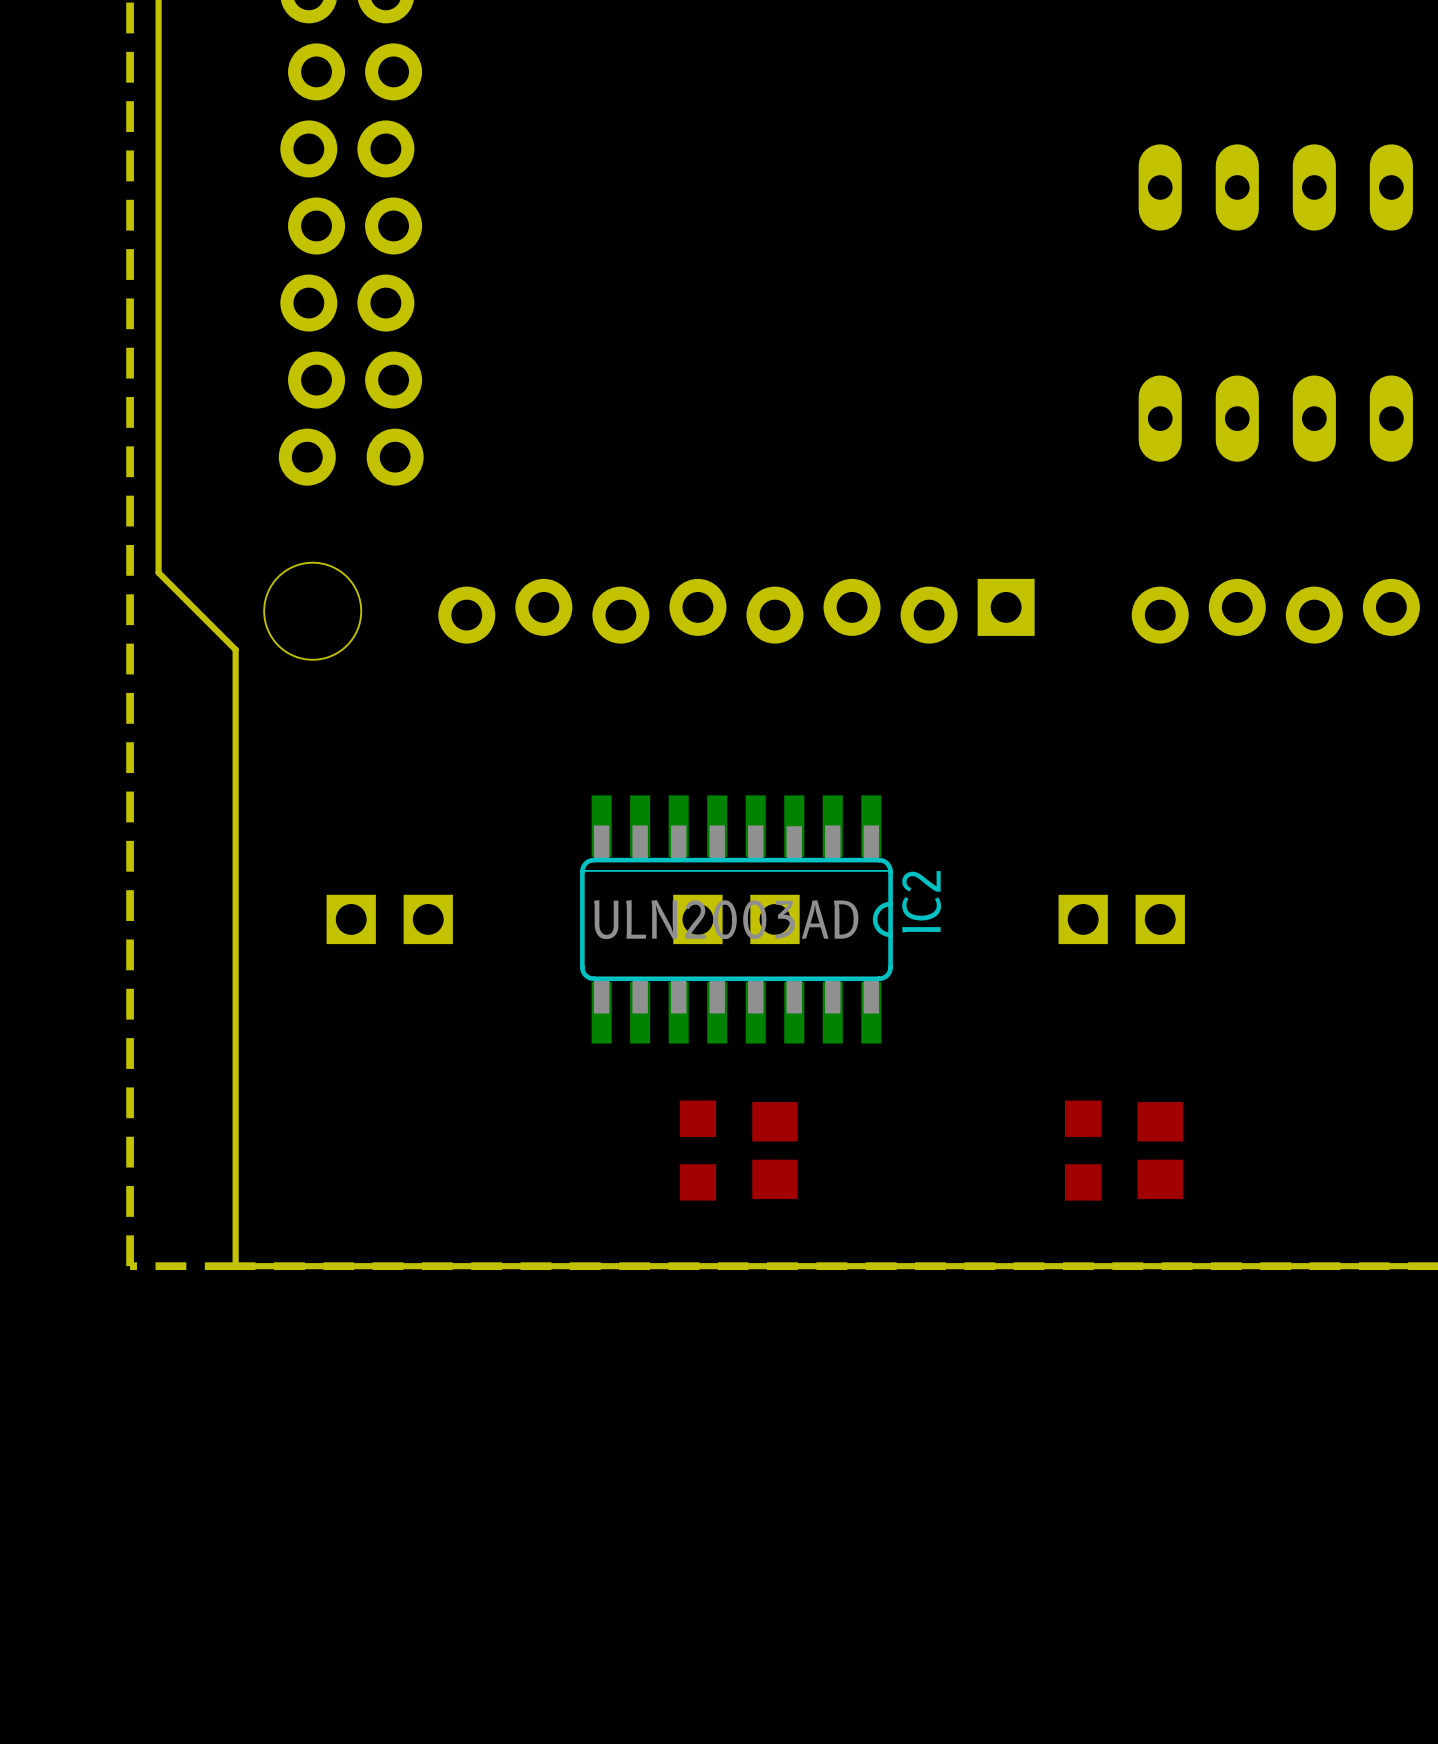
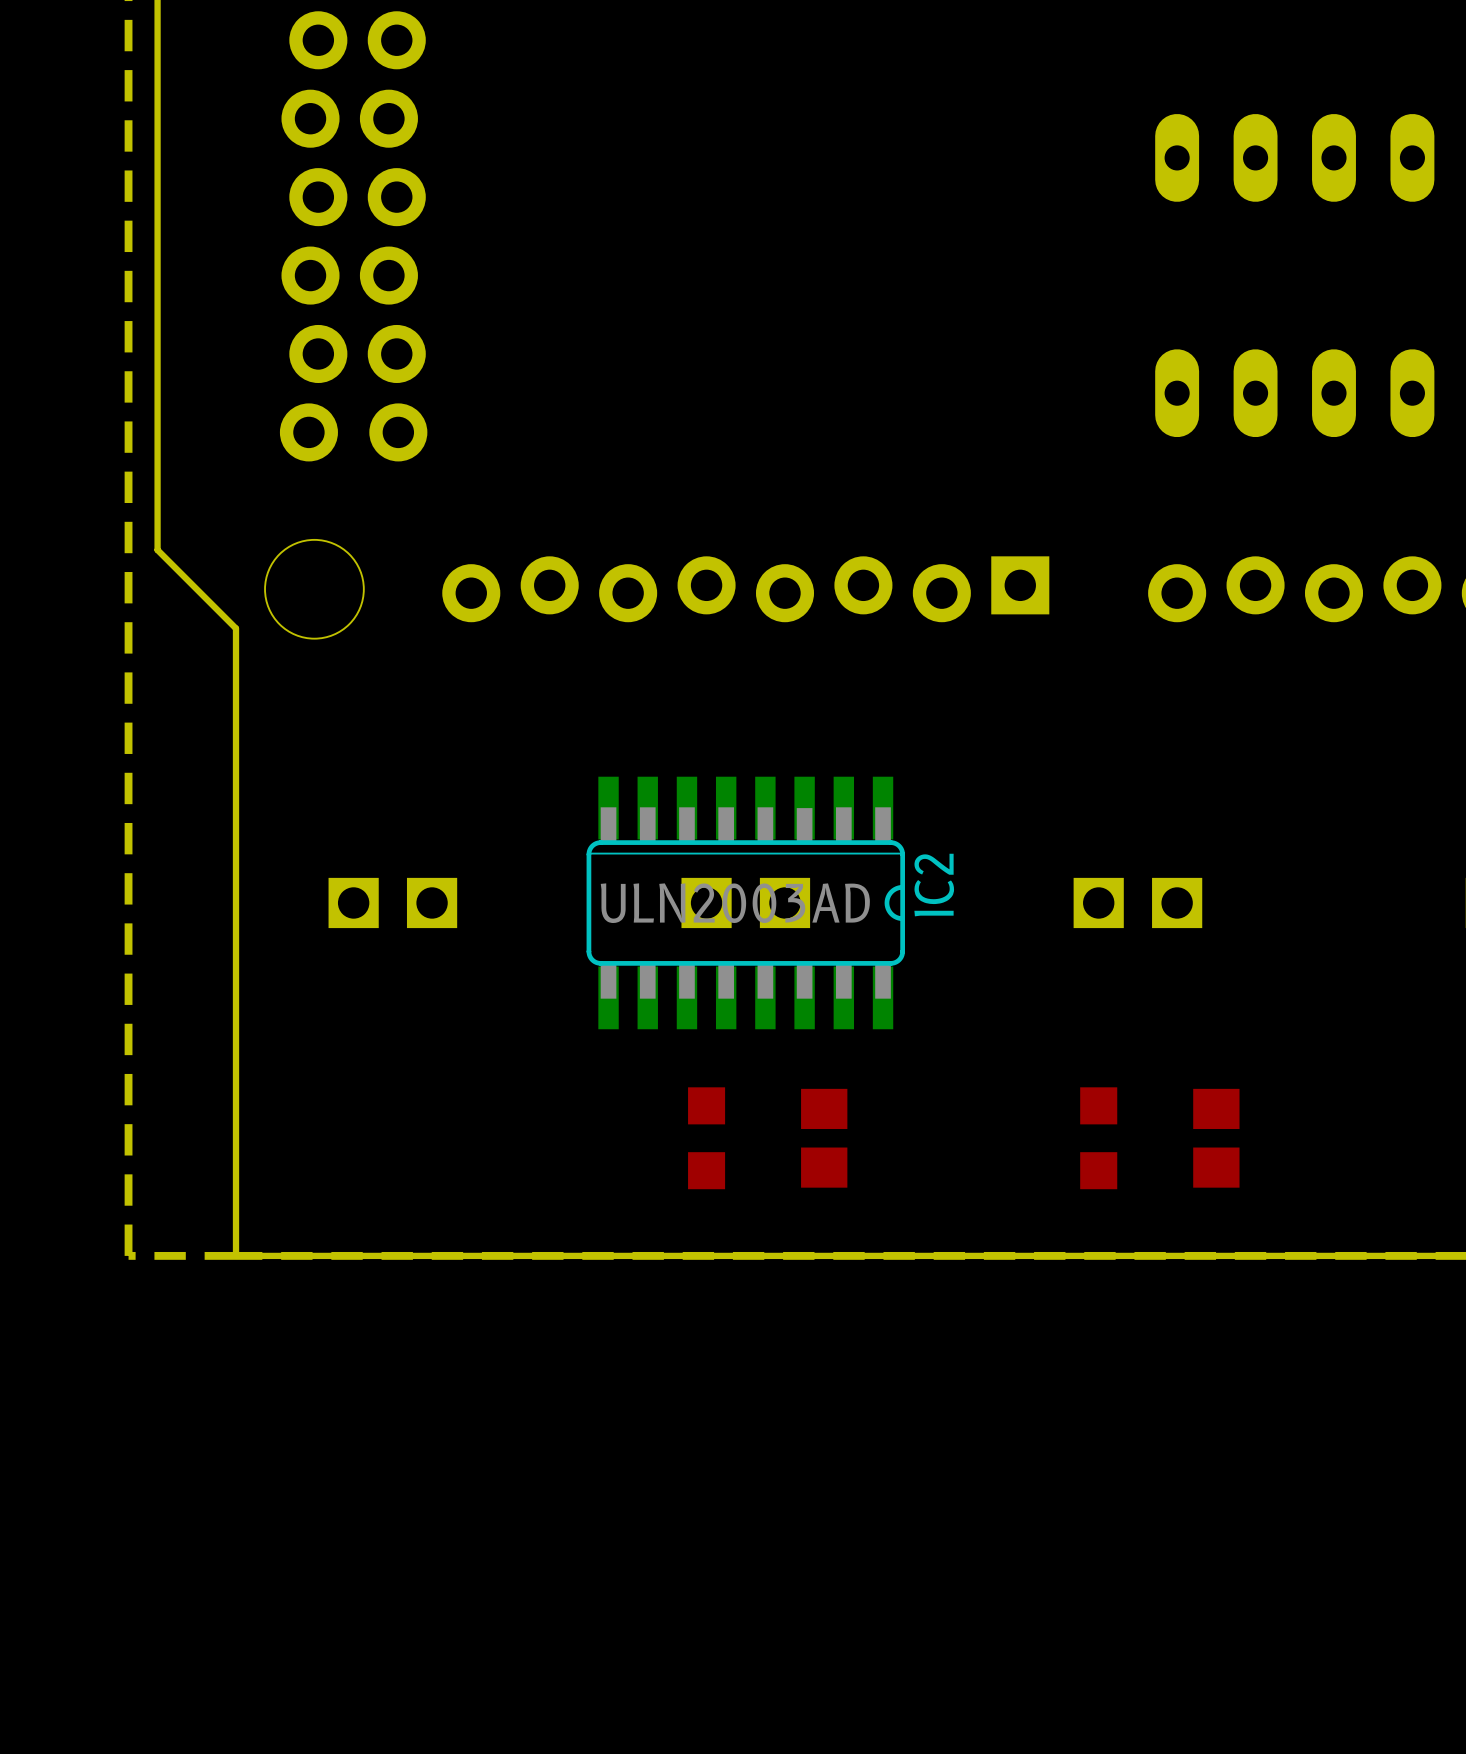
part position: (774, 1150) -> (824, 1138)
part position: (1160, 1150) -> (1216, 1138)

